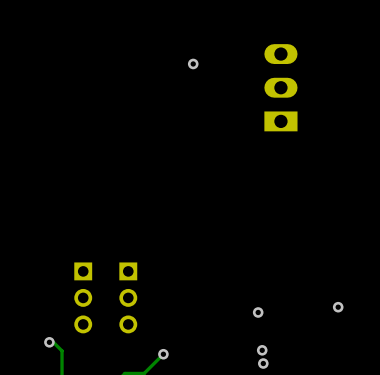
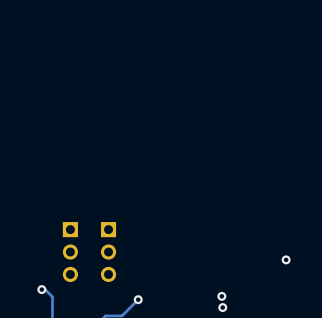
via: (193, 63) -> none
part: (280, 87) -> none
via: (258, 312) -> none

